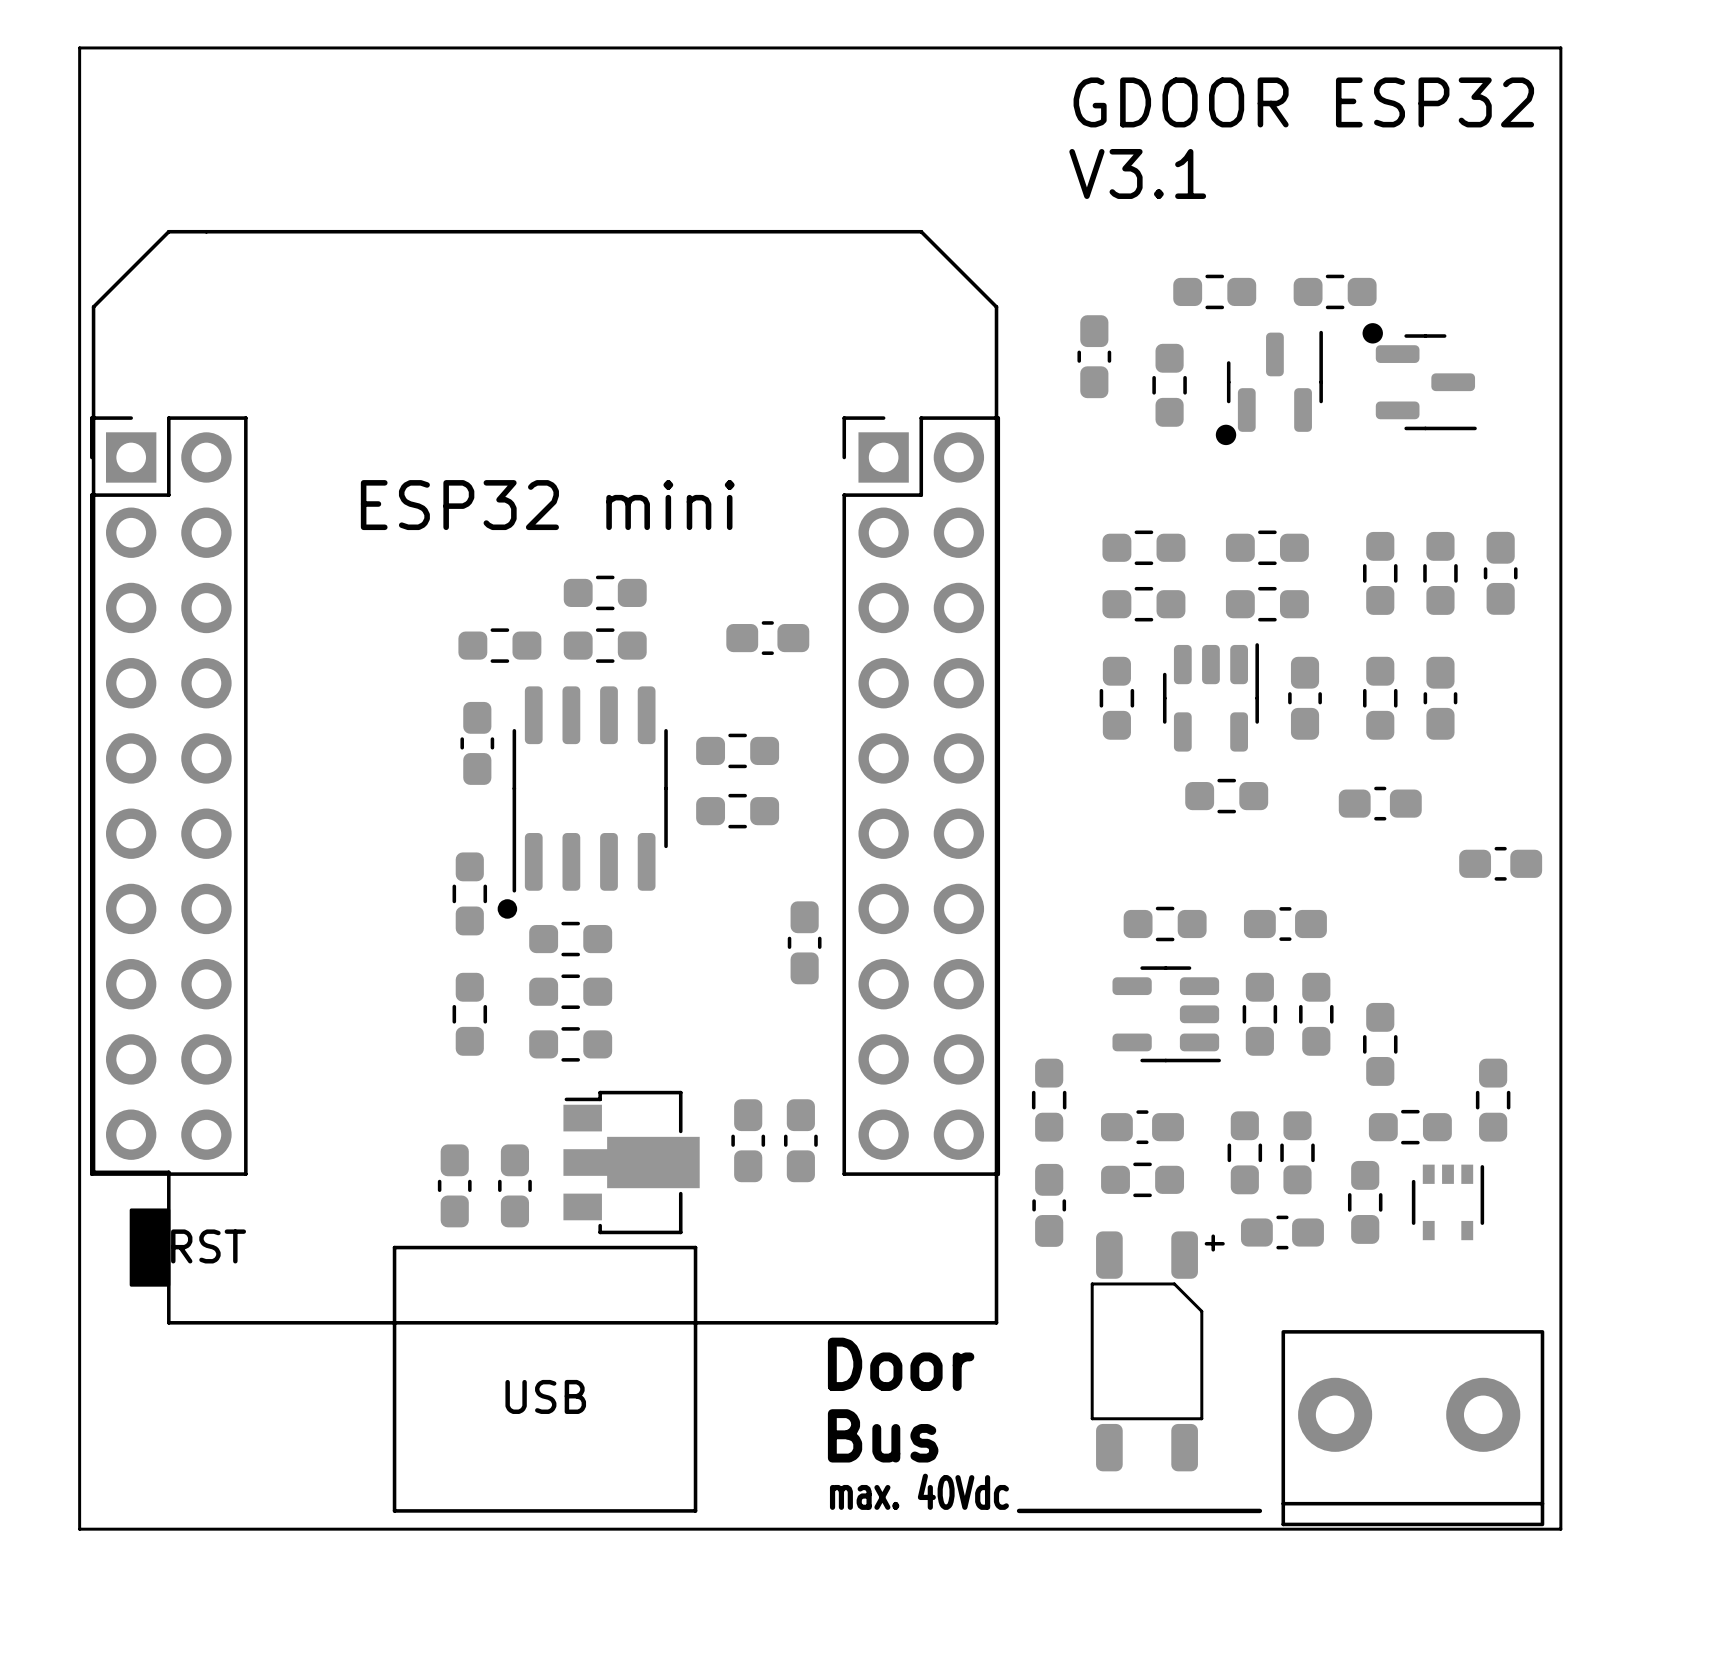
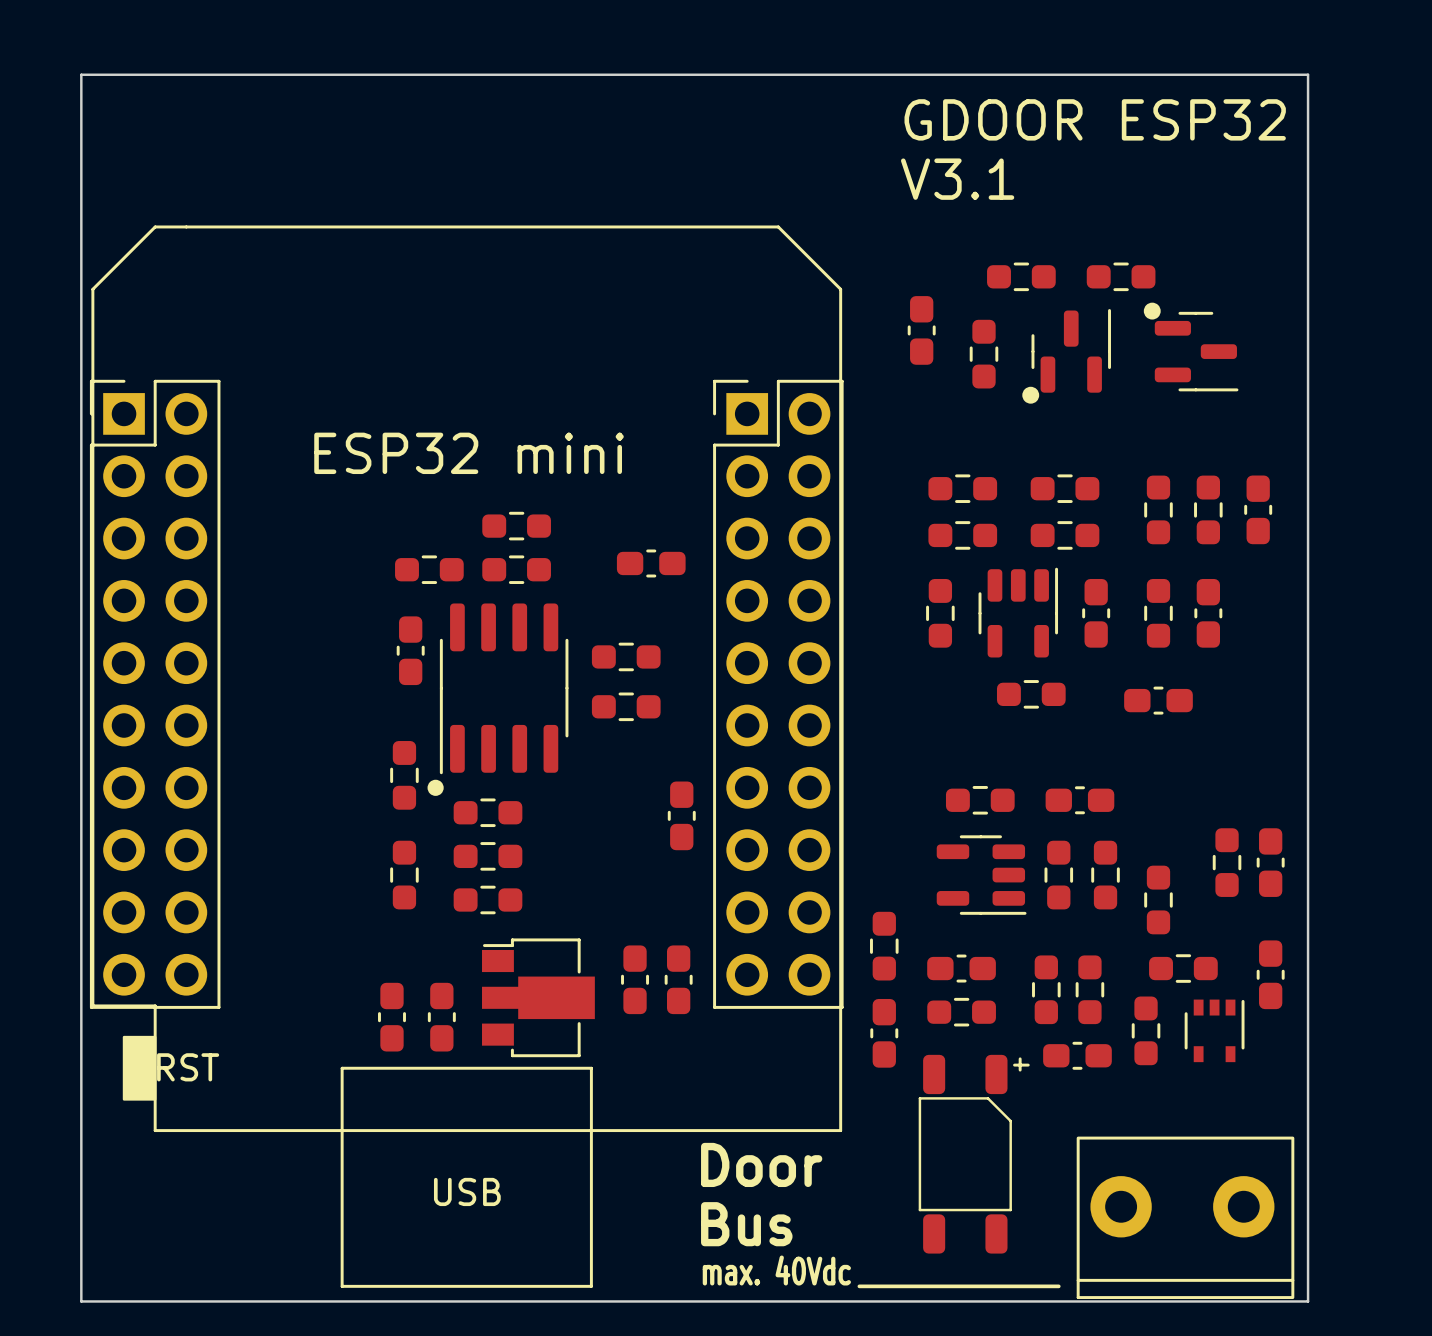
part: (1500, 863) -> none
part: none -> (1270, 862)
part position: (1493, 1100) -> (1227, 862)
part: none -> (1270, 974)

